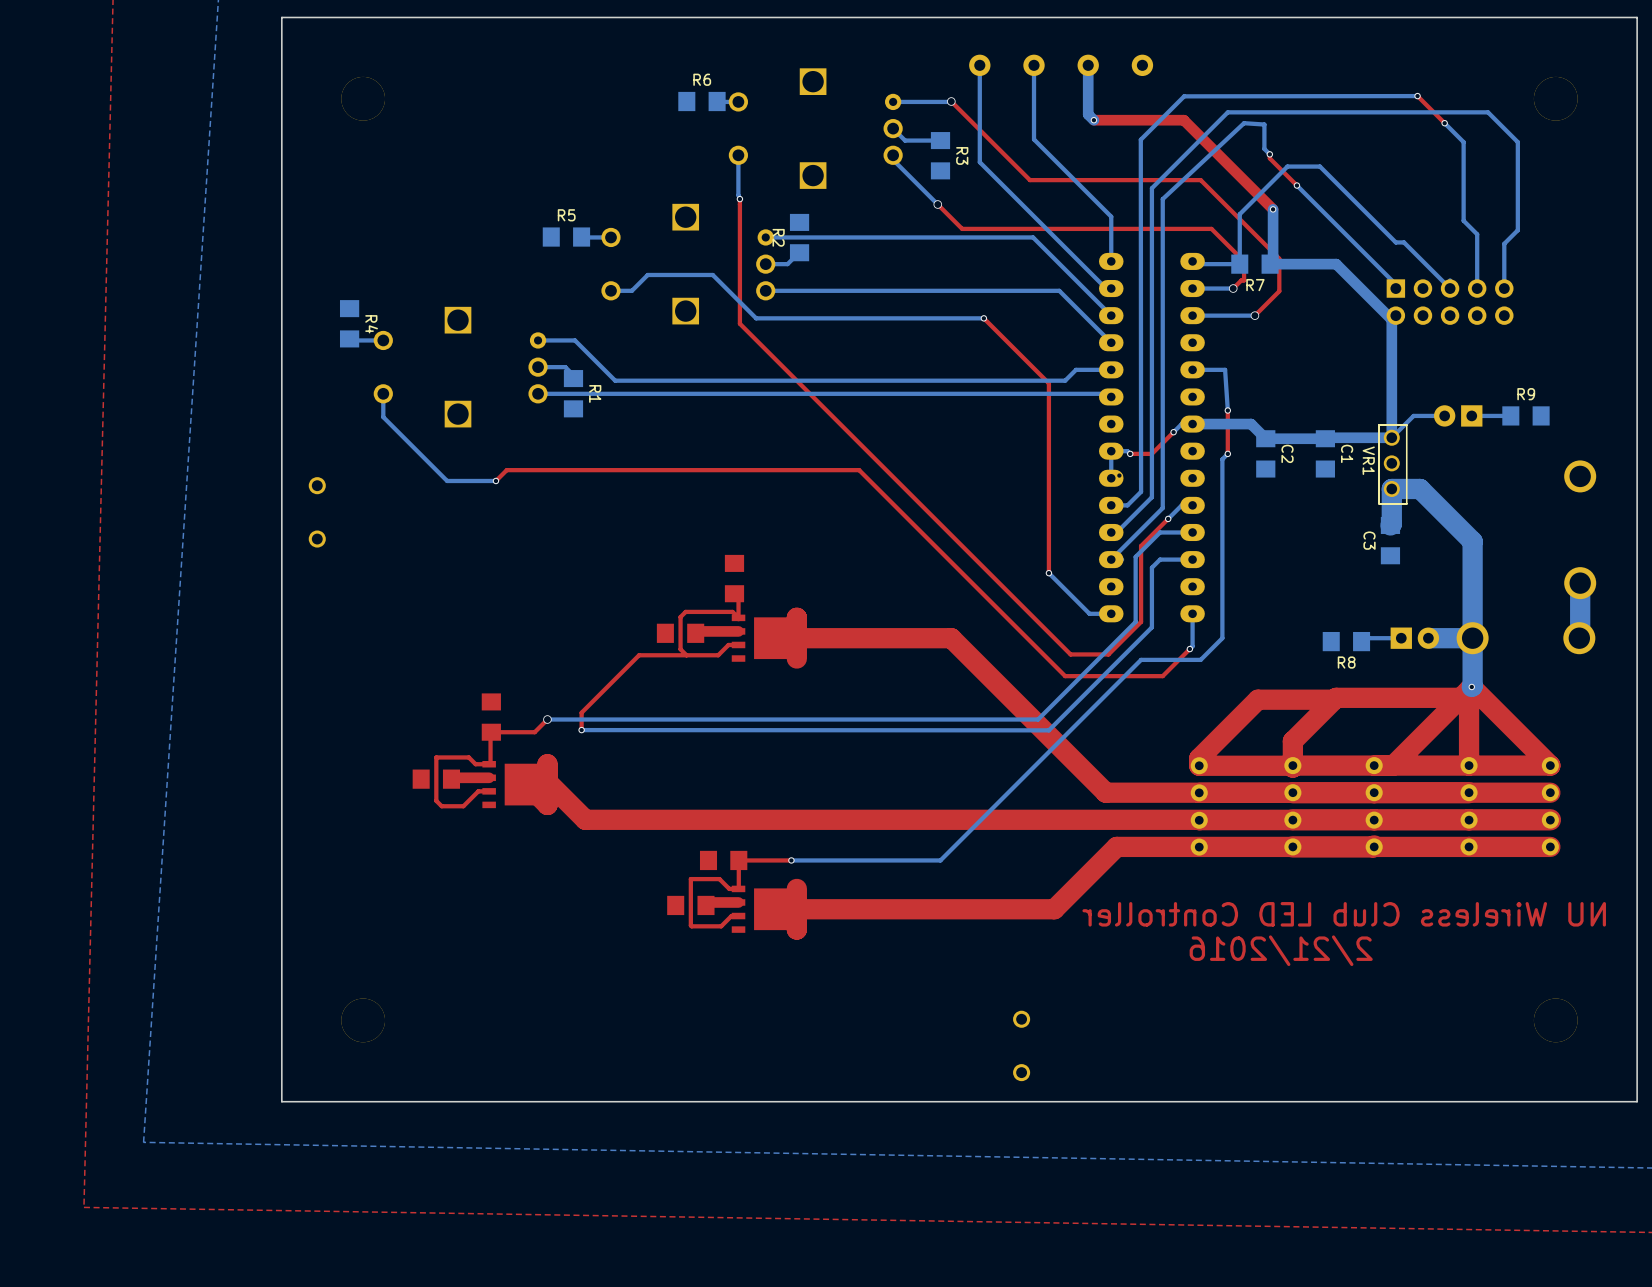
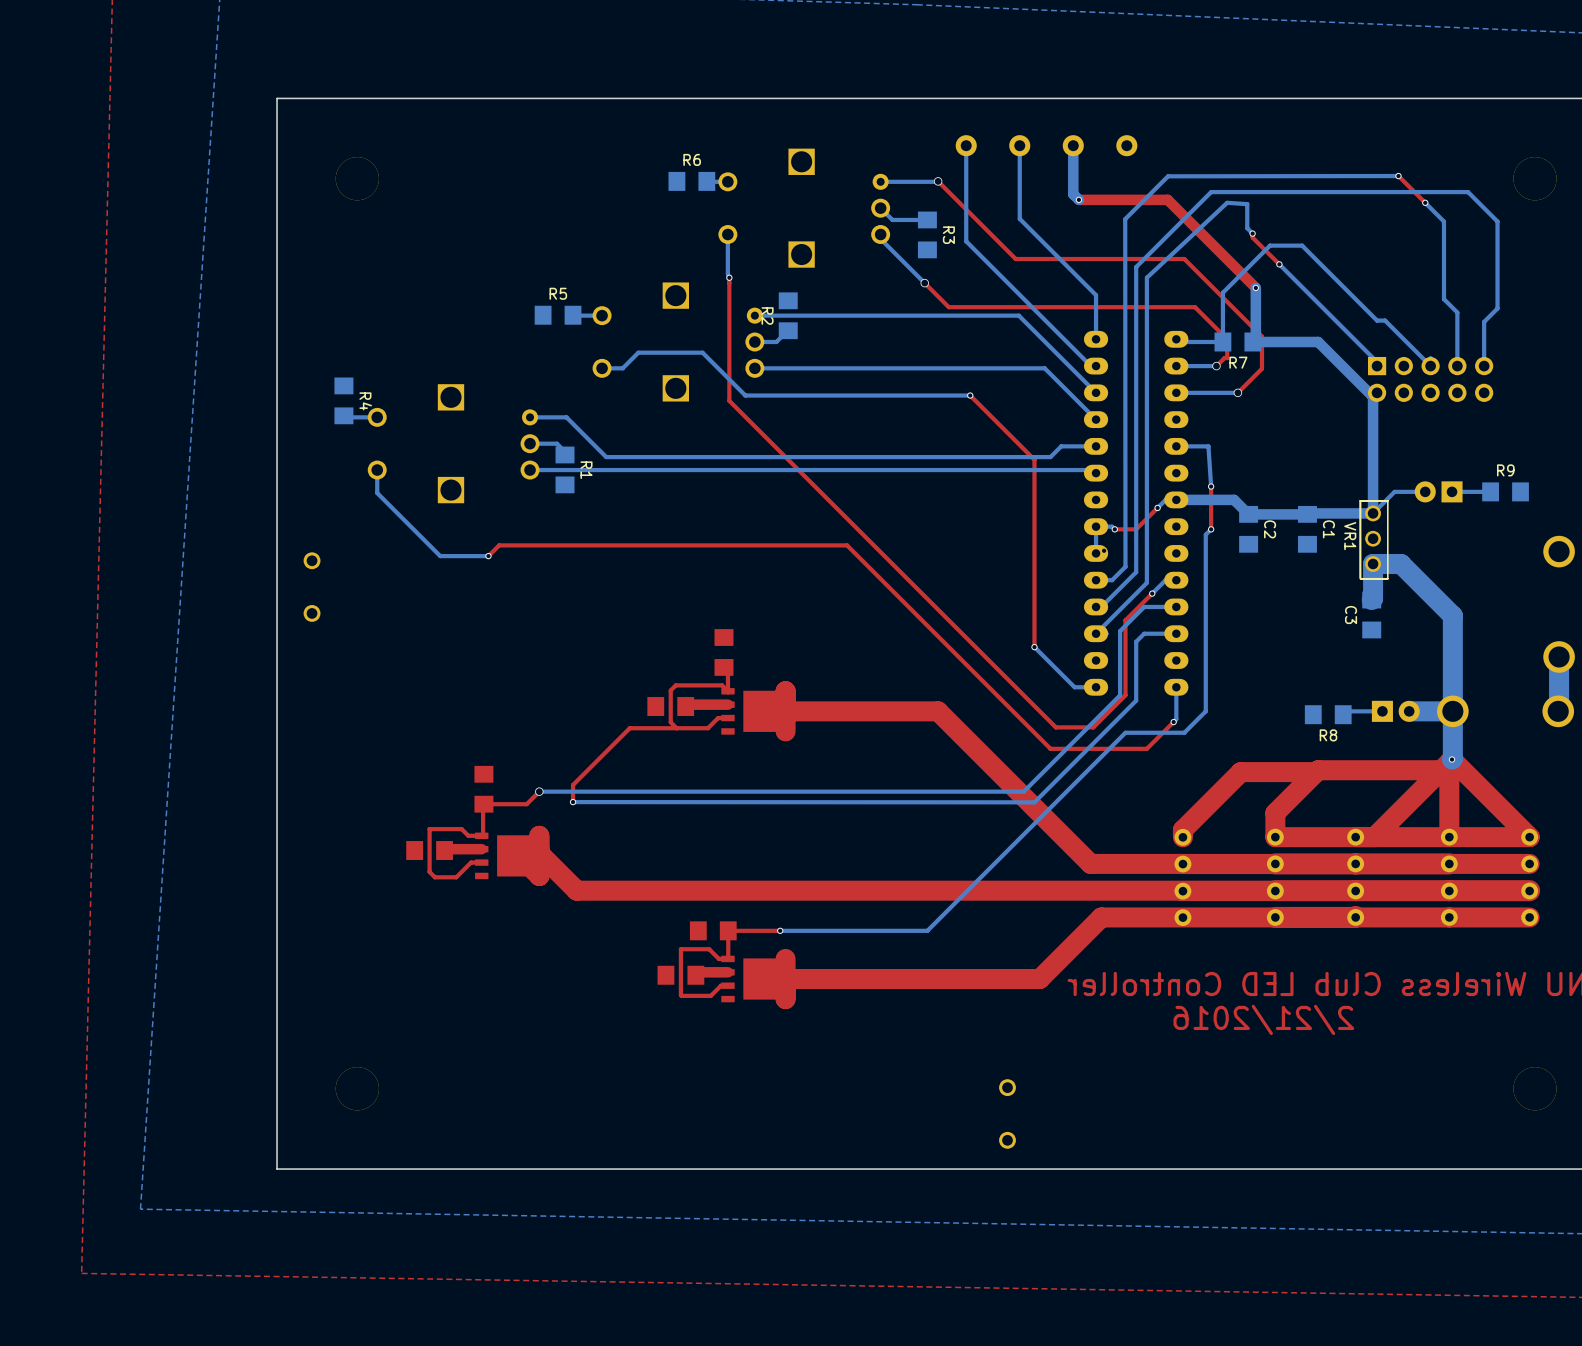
top track: (1292, 765) (1292, 767) (1291, 765) (1199, 765) -> none

